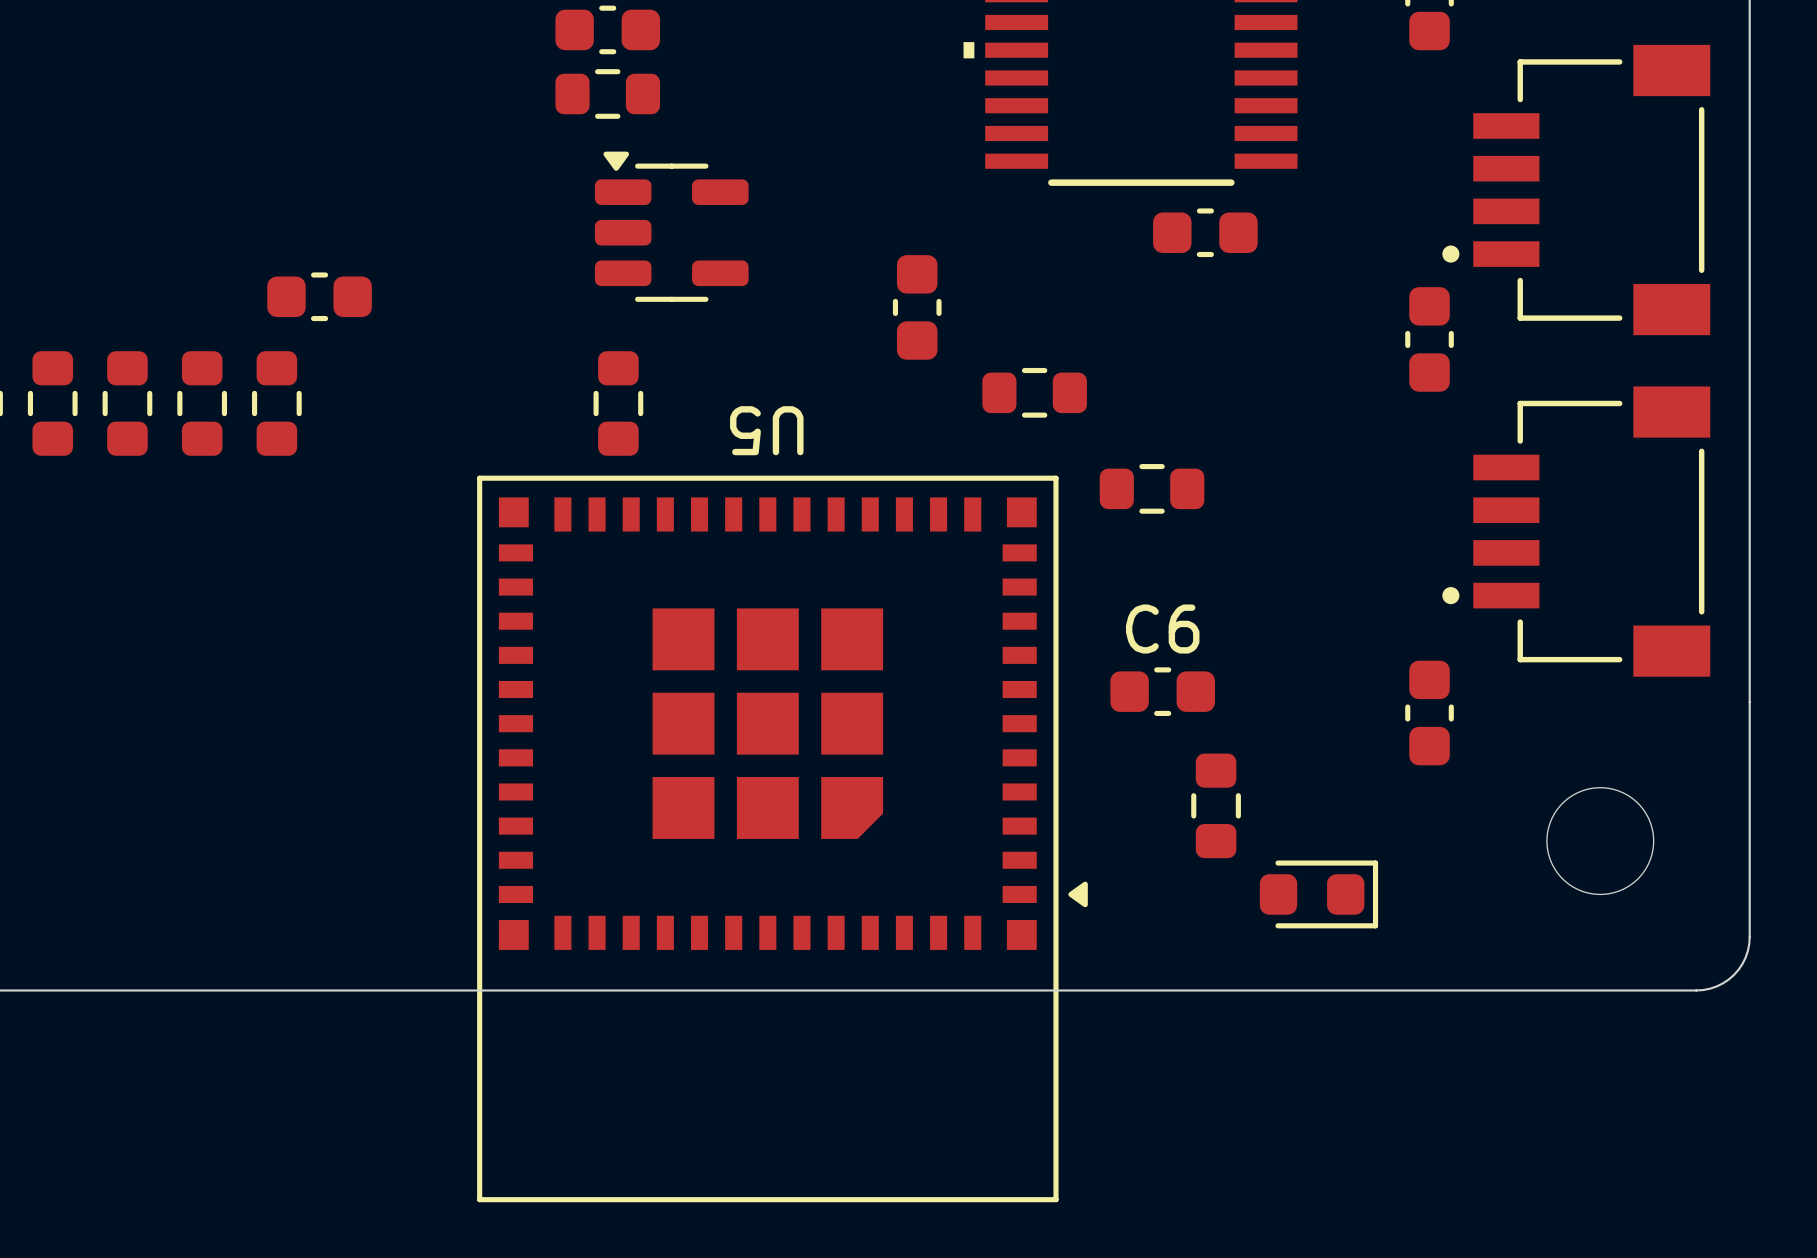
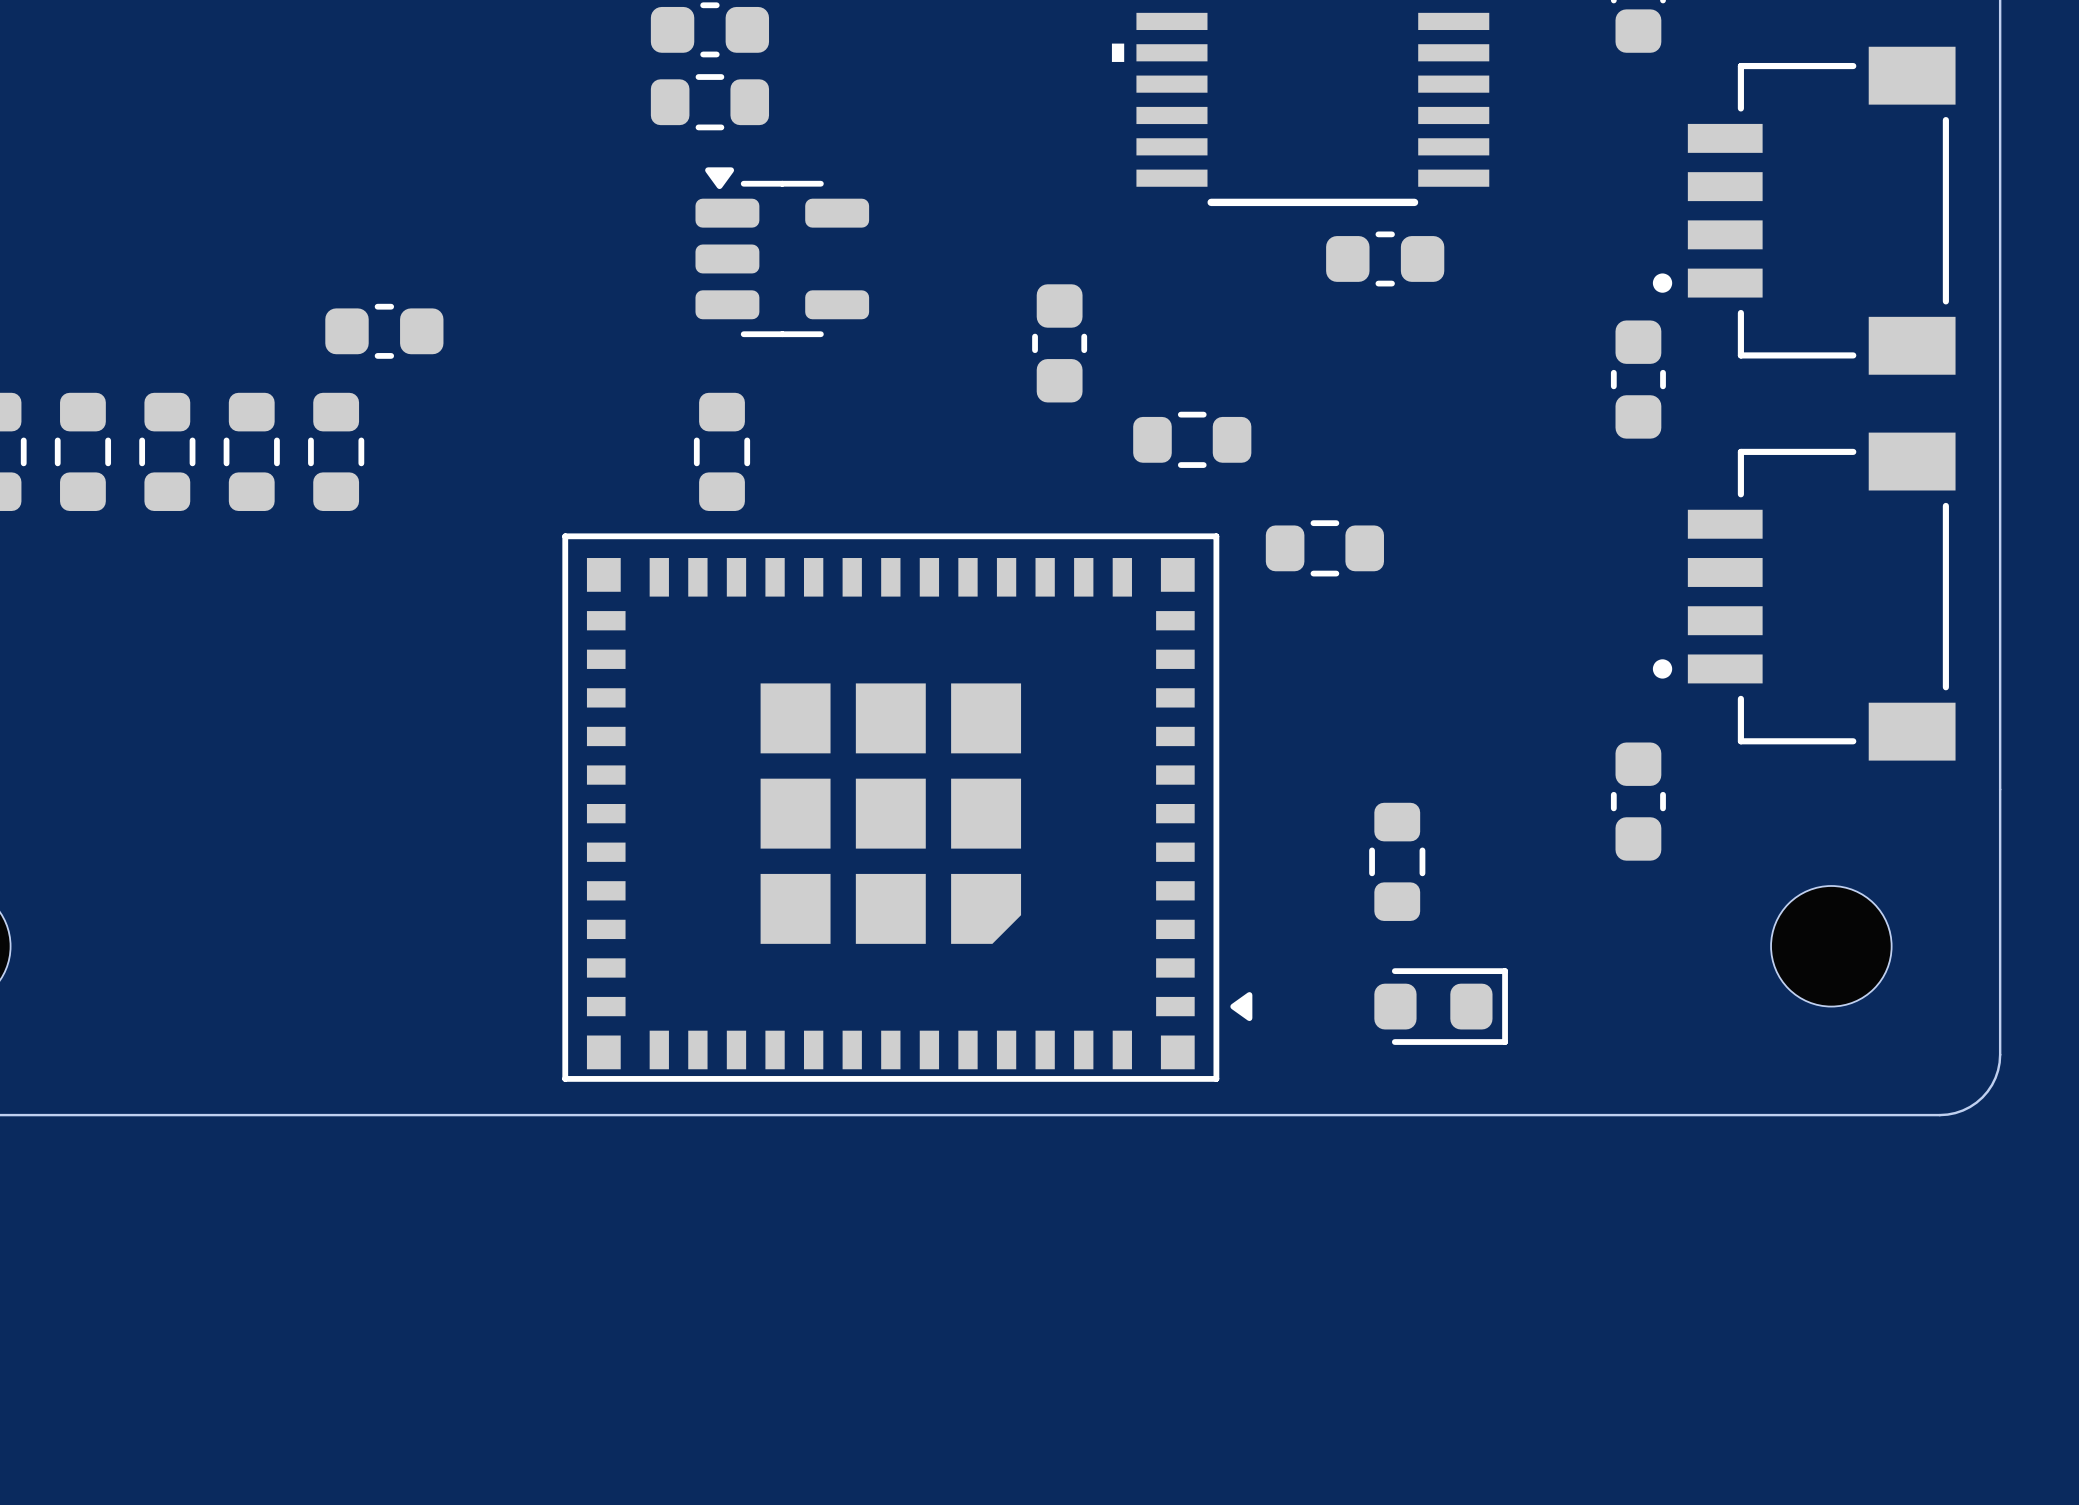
C6: (1162, 691) -> none
part: none -> (907, 807)
part position: (1216, 805) -> (1397, 861)
U5: (782, 838) -> none
part position: (1318, 894) -> (1441, 1006)

